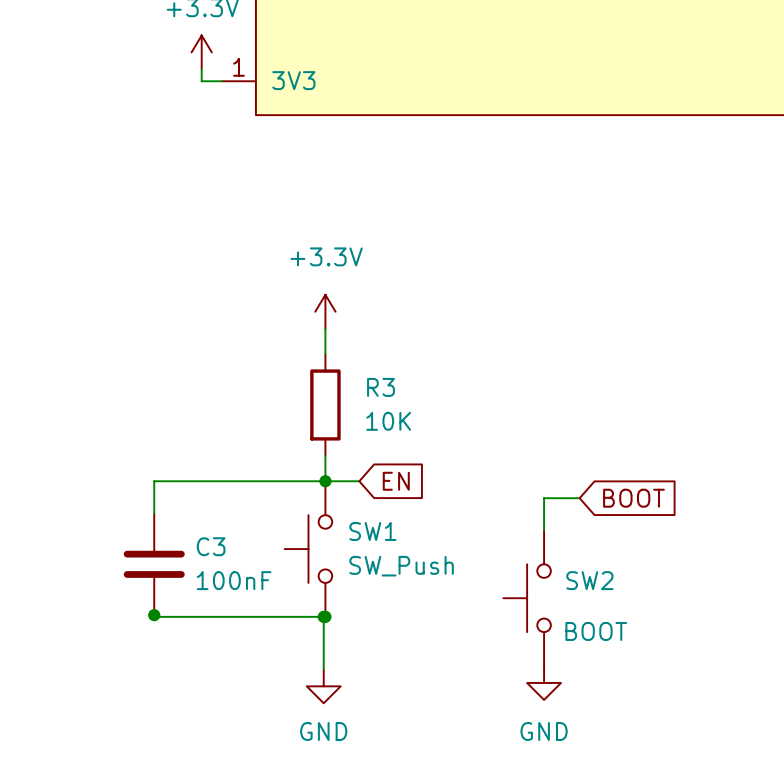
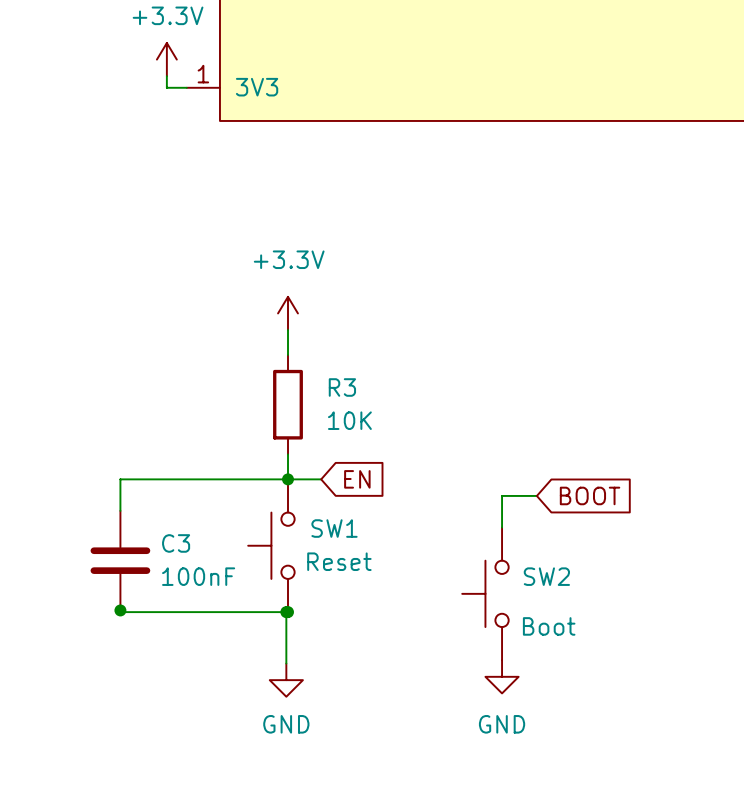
SW1 value: SW_Push (401, 566) -> Reset (339, 561)
SW2 value: BOOT (596, 631) -> Boot (549, 626)

